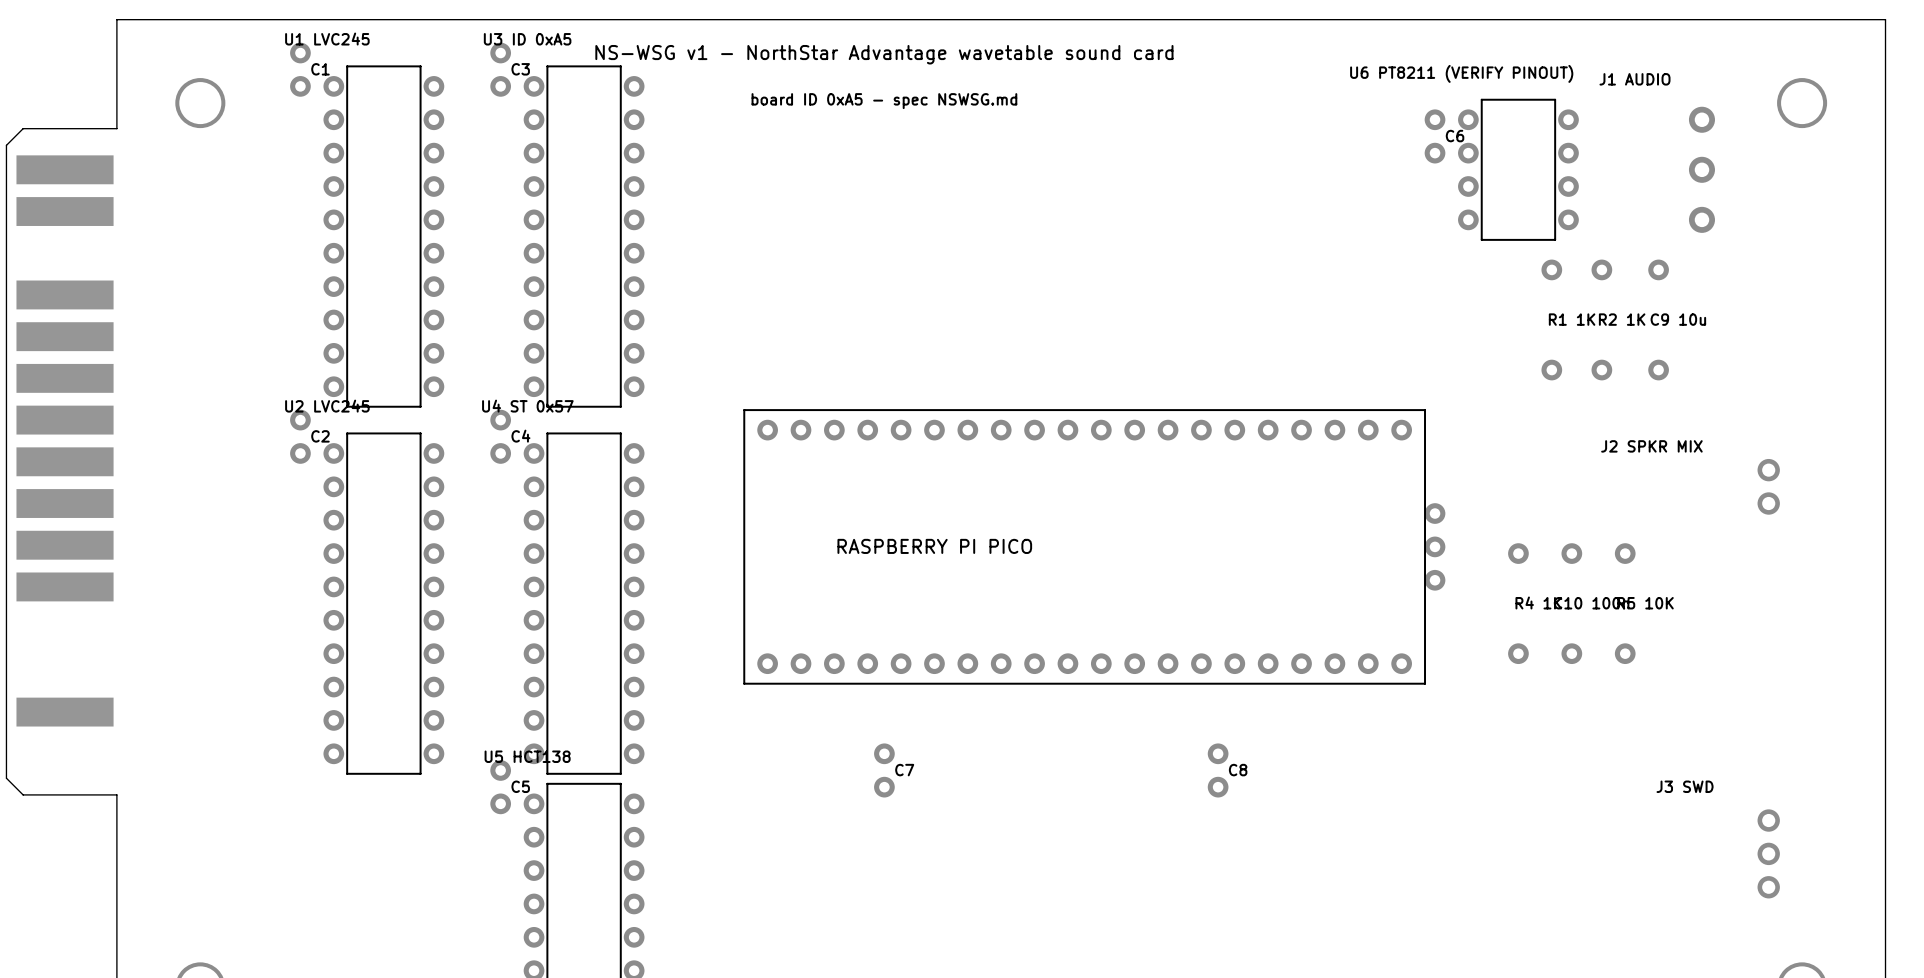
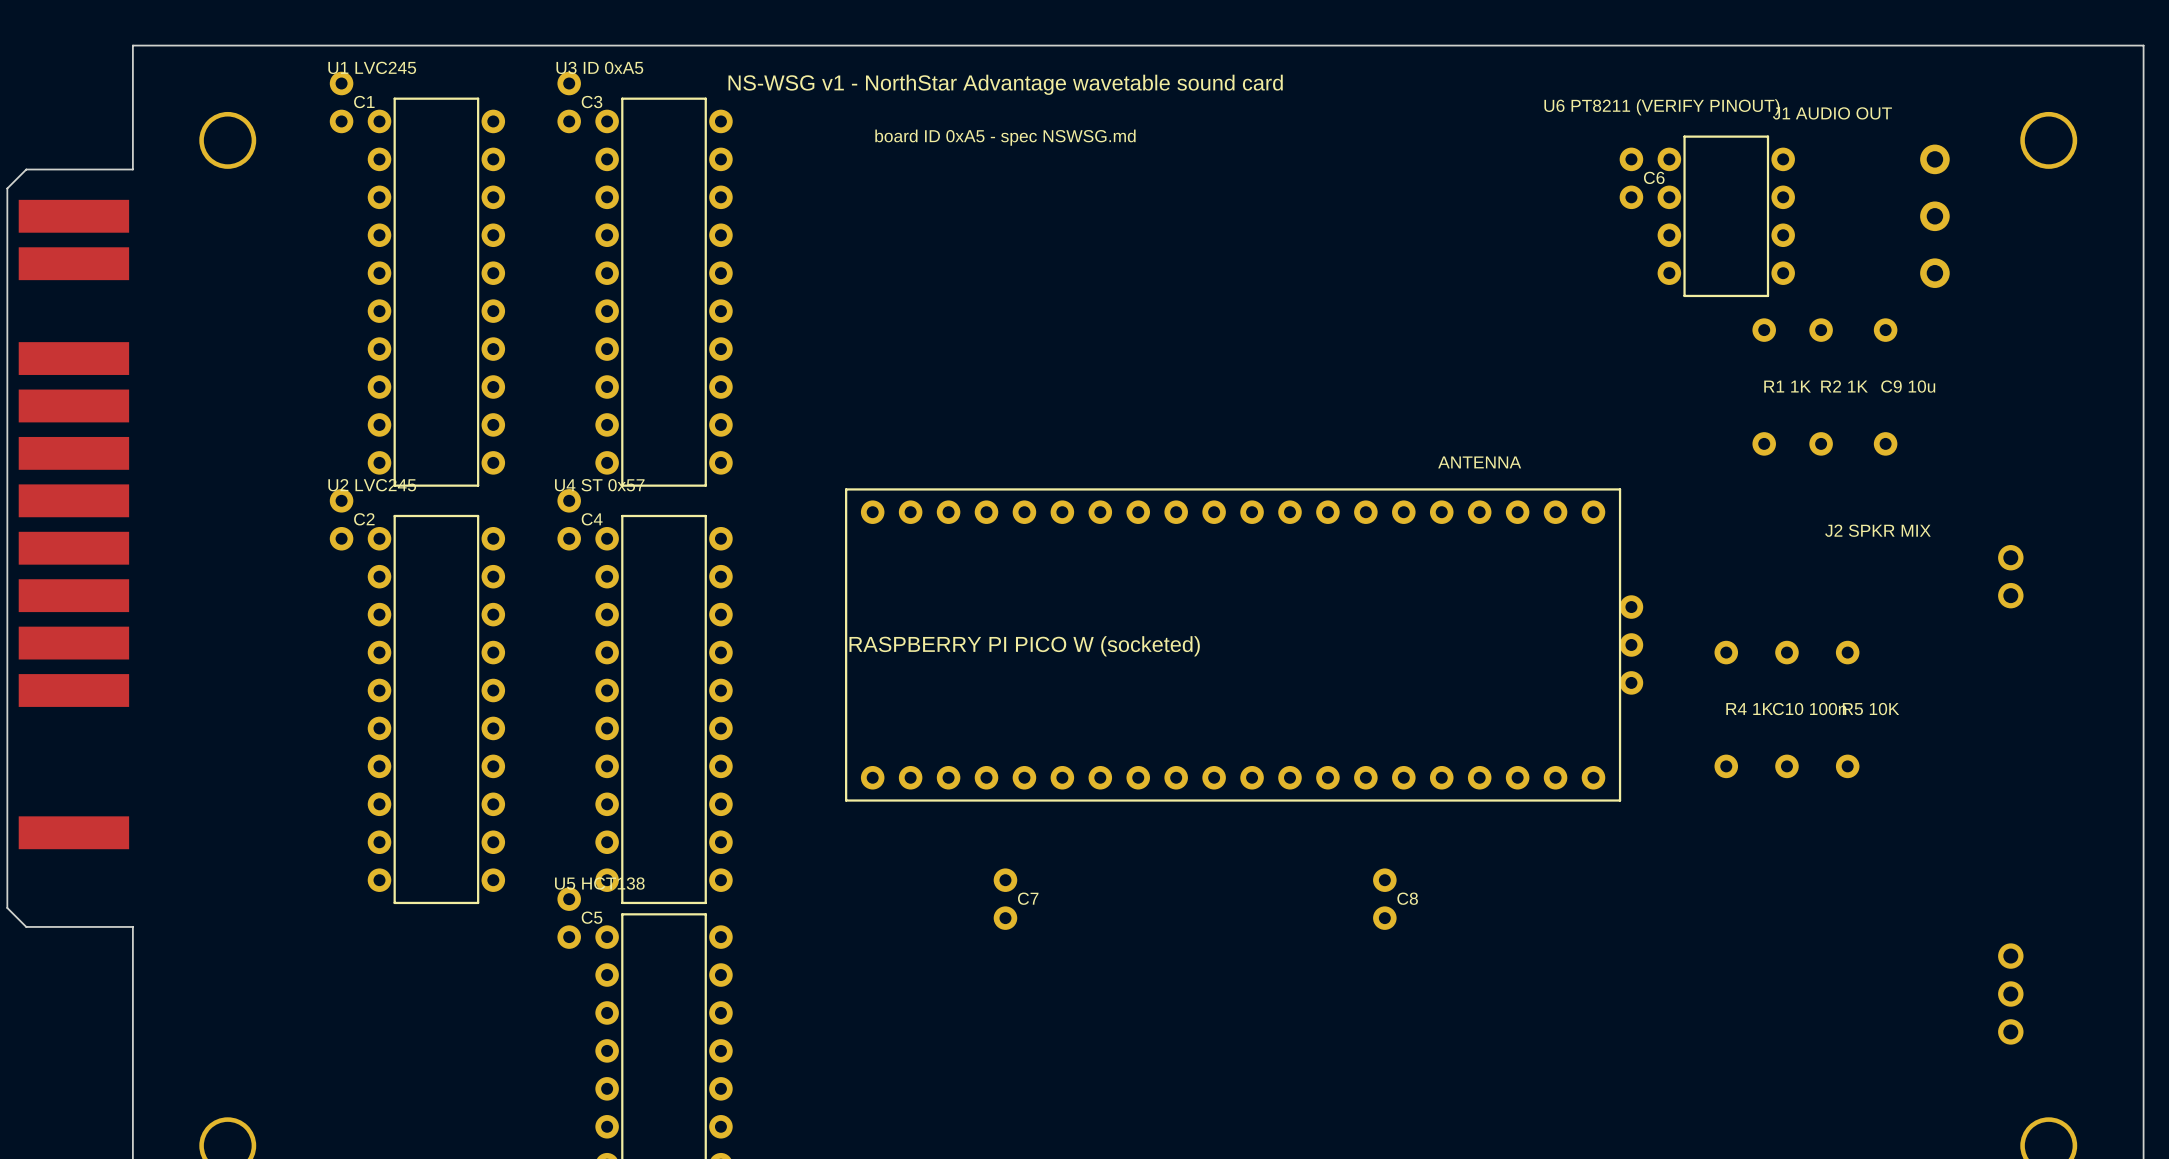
text: J1 AUDIO (1634, 79) -> J1 AUDIO OUT (1832, 113)
text: none -> ANTENNA (1479, 462)
text: RASPBERRY PI PICO (934, 546) -> RASPBERRY PI PICO W (socketed) (1024, 646)
text: J3 SWD (1685, 786) -> none

